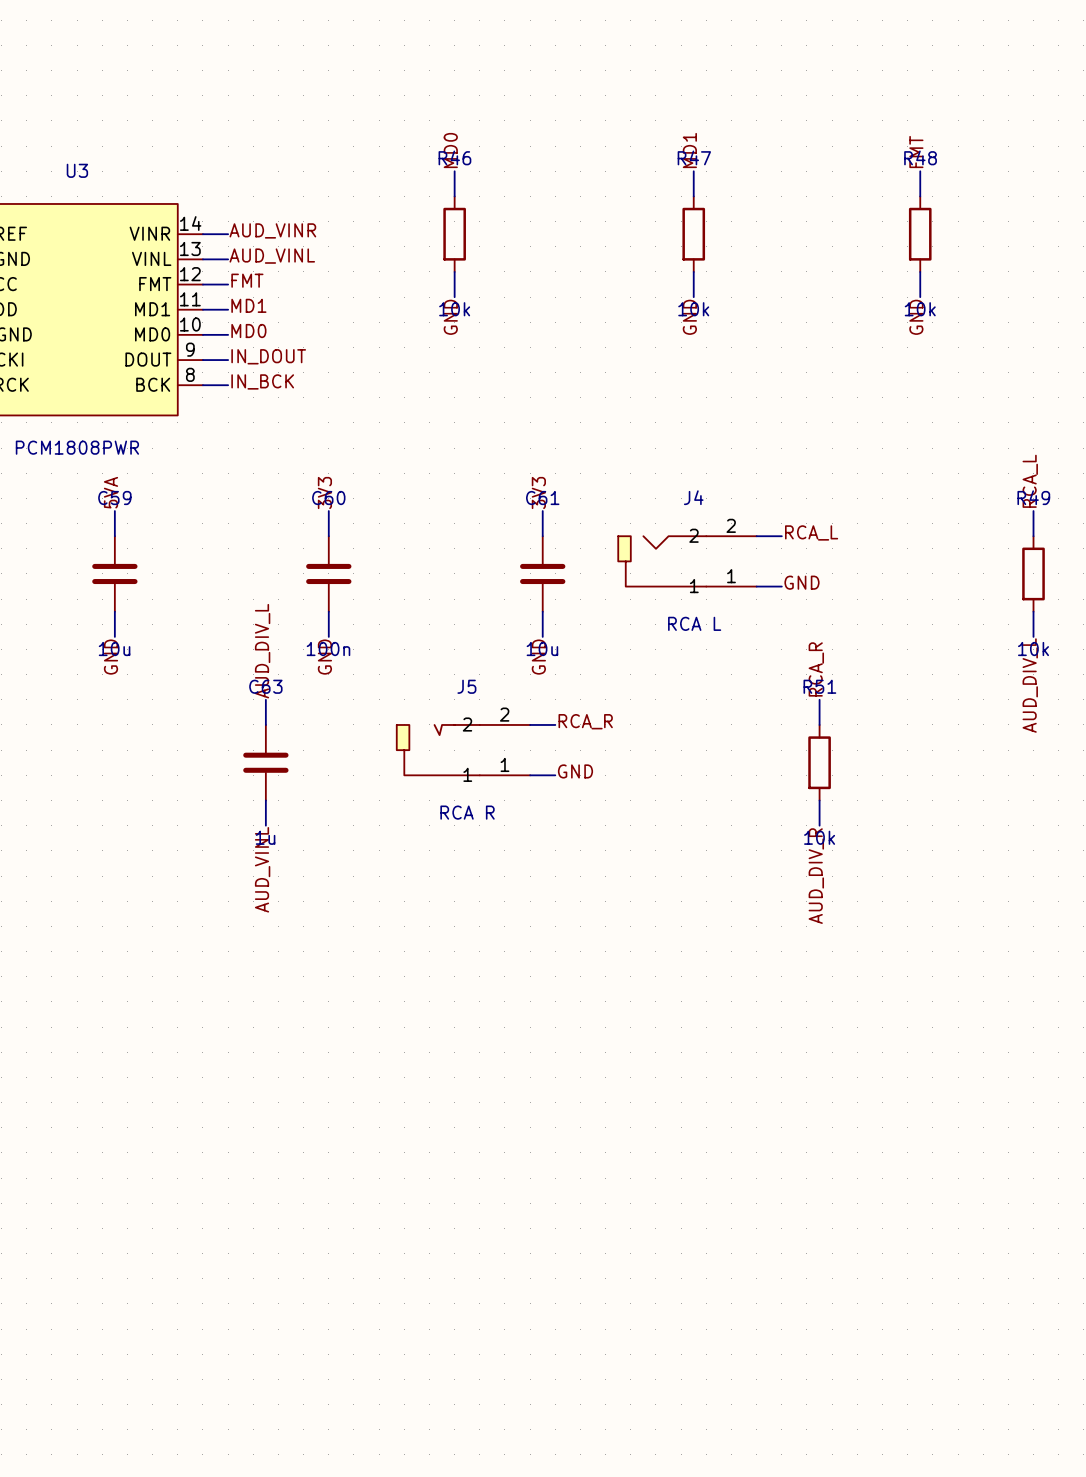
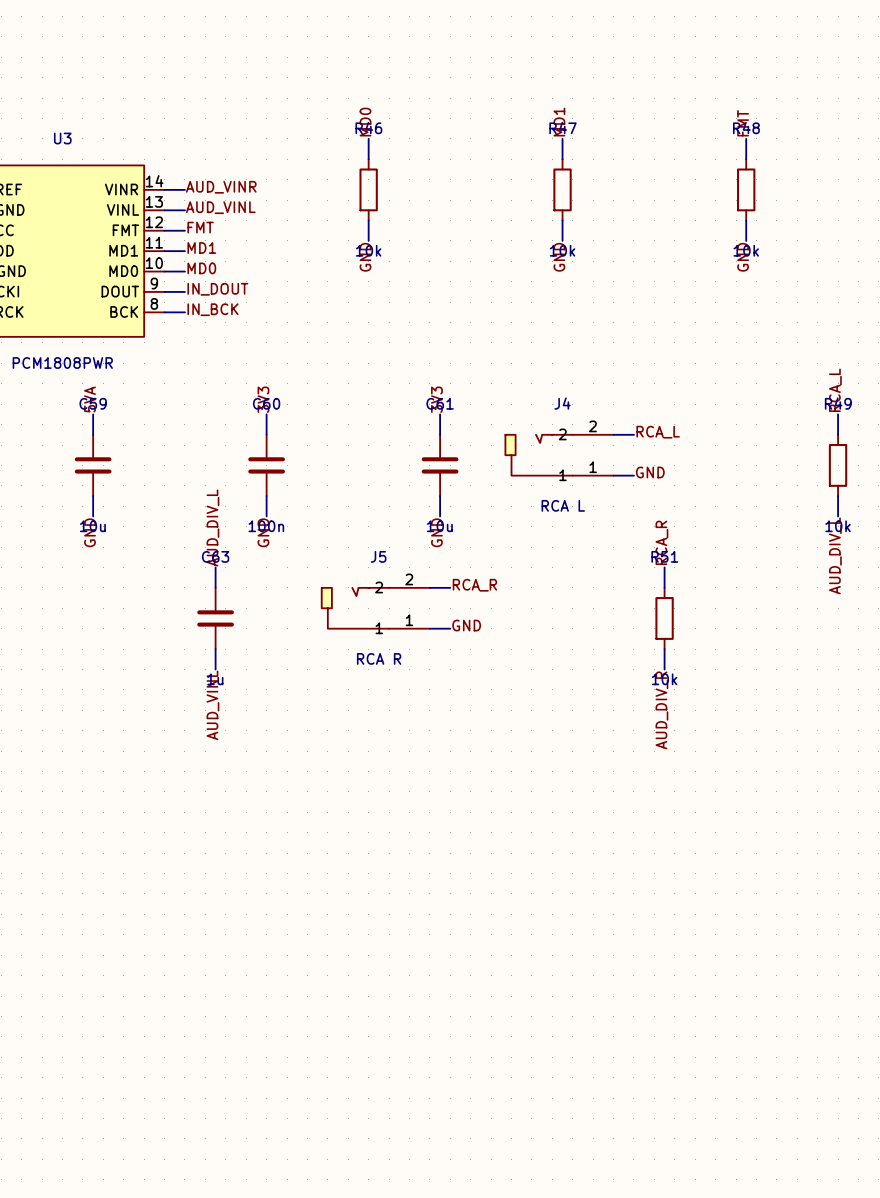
J4 symbol: [618, 536, 757, 587] -> [505, 434, 614, 476]

